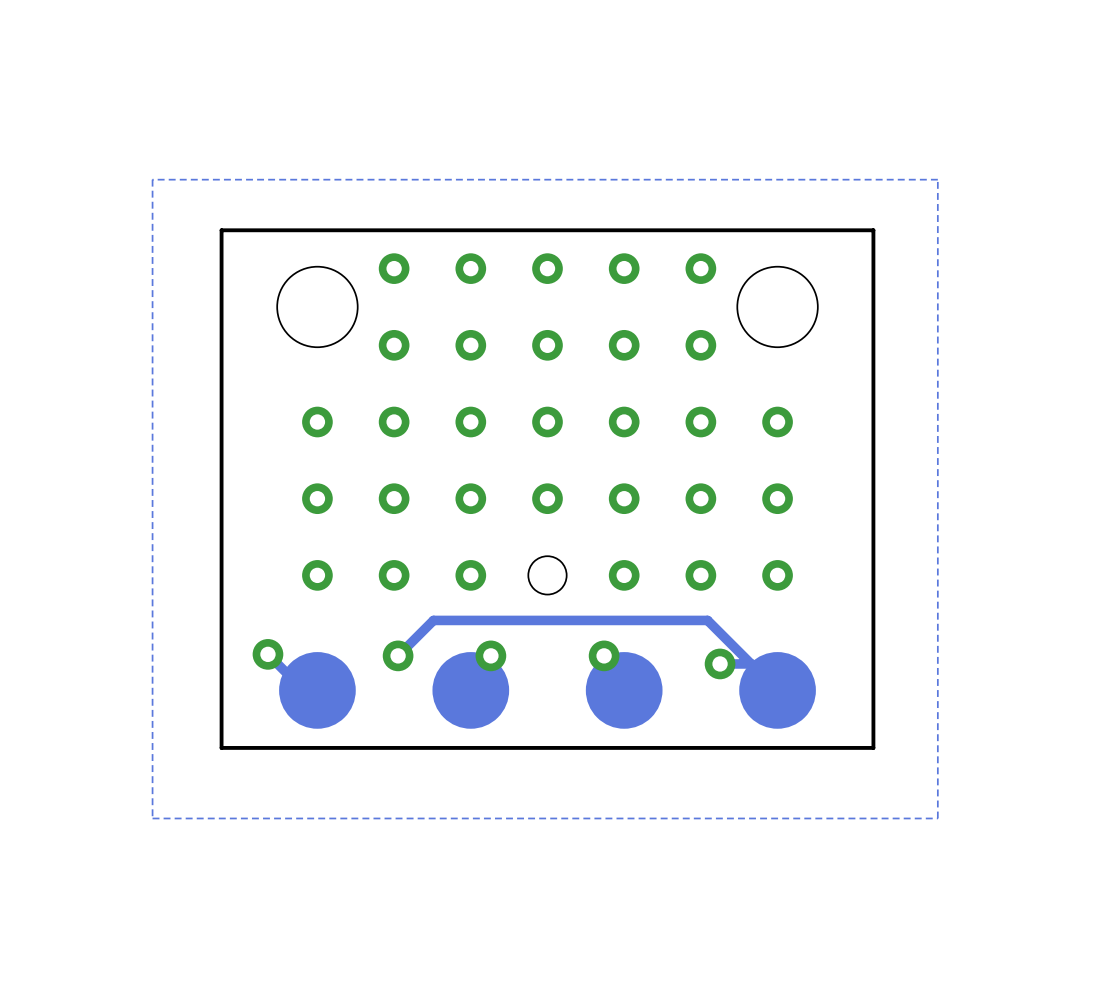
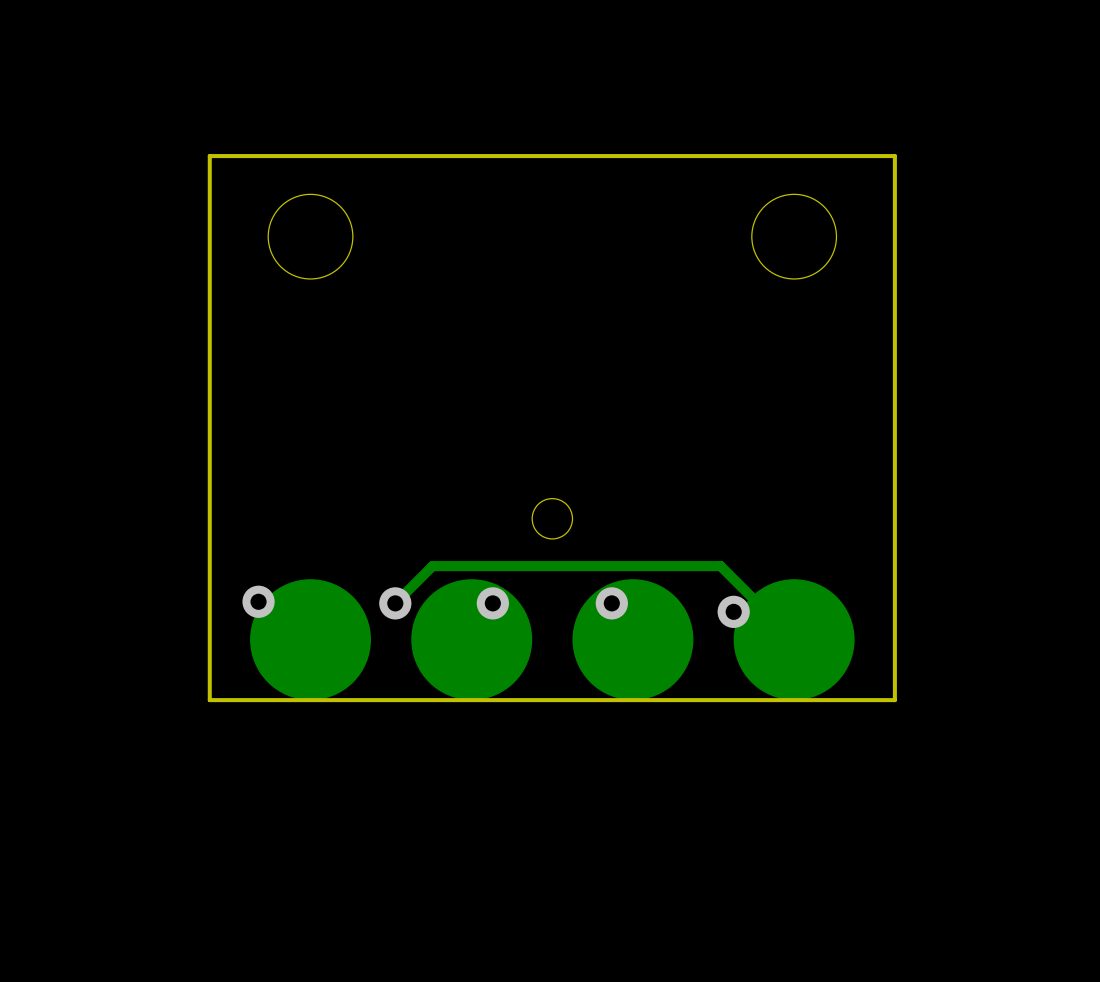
zone outline: (937, 179) (937, 818) (152, 818) (152, 179) (937, 179) -> none
via: (394, 268) -> none
via: (470, 268) -> none
via: (547, 268) -> none
via: (624, 268) -> none
via: (700, 268) -> none
via: (394, 345) -> none
via: (470, 345) -> none
via: (547, 345) -> none
via: (624, 345) -> none
via: (700, 345) -> none
via: (317, 422) -> none
via: (394, 422) -> none
via: (470, 422) -> none
via: (547, 422) -> none
via: (624, 422) -> none
via: (700, 422) -> none
via: (777, 422) -> none
via: (317, 498) -> none
via: (394, 498) -> none
via: (470, 498) -> none
via: (547, 498) -> none
via: (624, 498) -> none
via: (700, 498) -> none
via: (777, 498) -> none
via: (317, 575) -> none
via: (394, 575) -> none
via: (470, 575) -> none
via: (624, 575) -> none
via: (700, 575) -> none
via: (777, 575) -> none
part footprint: [279, 652, 356, 729] -> [250, 579, 371, 701]
part footprint: [432, 652, 510, 729] -> [411, 579, 533, 701]
part footprint: [585, 652, 663, 729] -> [572, 579, 694, 701]
part footprint: [739, 652, 816, 729] -> [733, 579, 855, 701]

